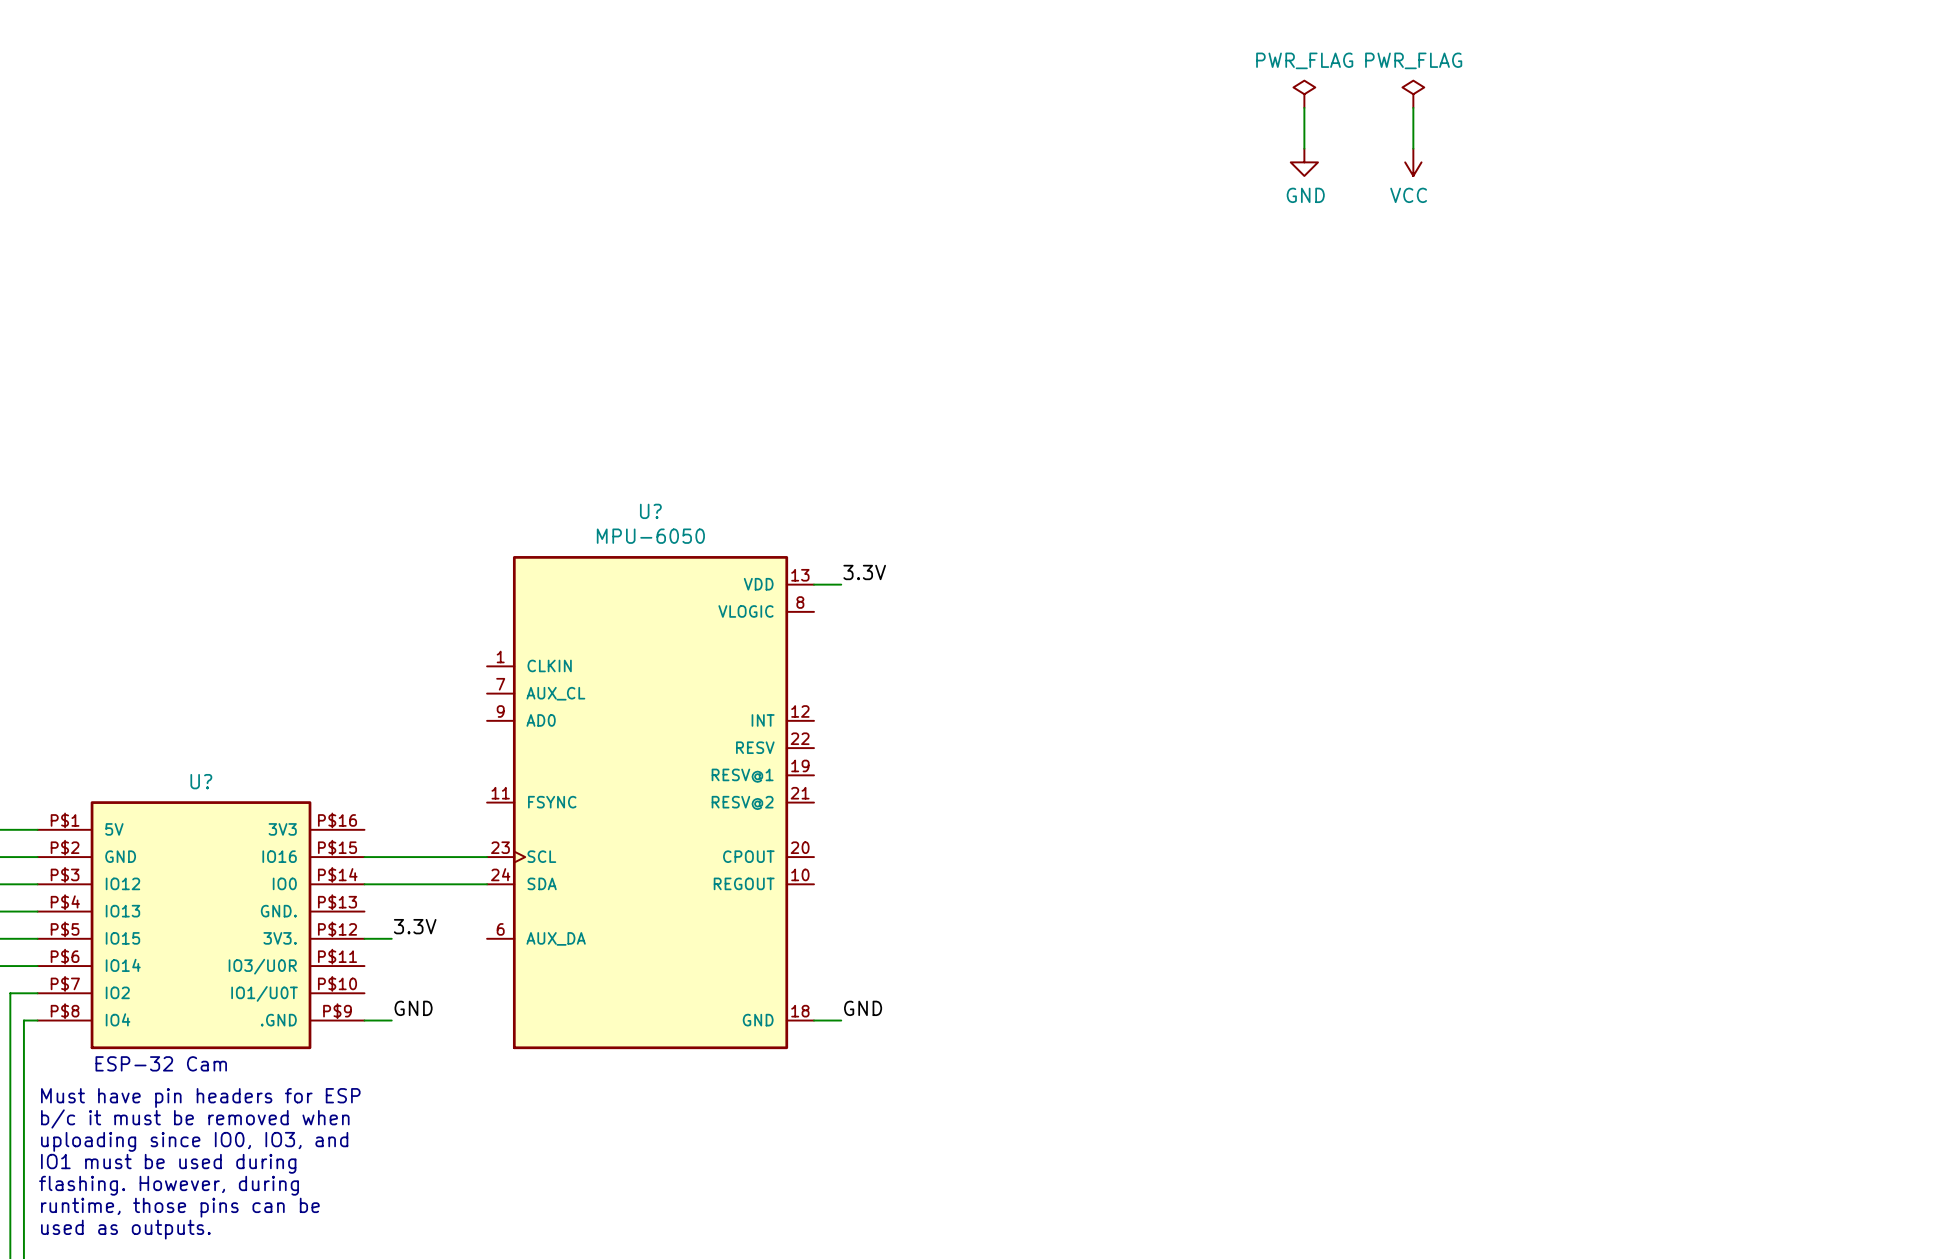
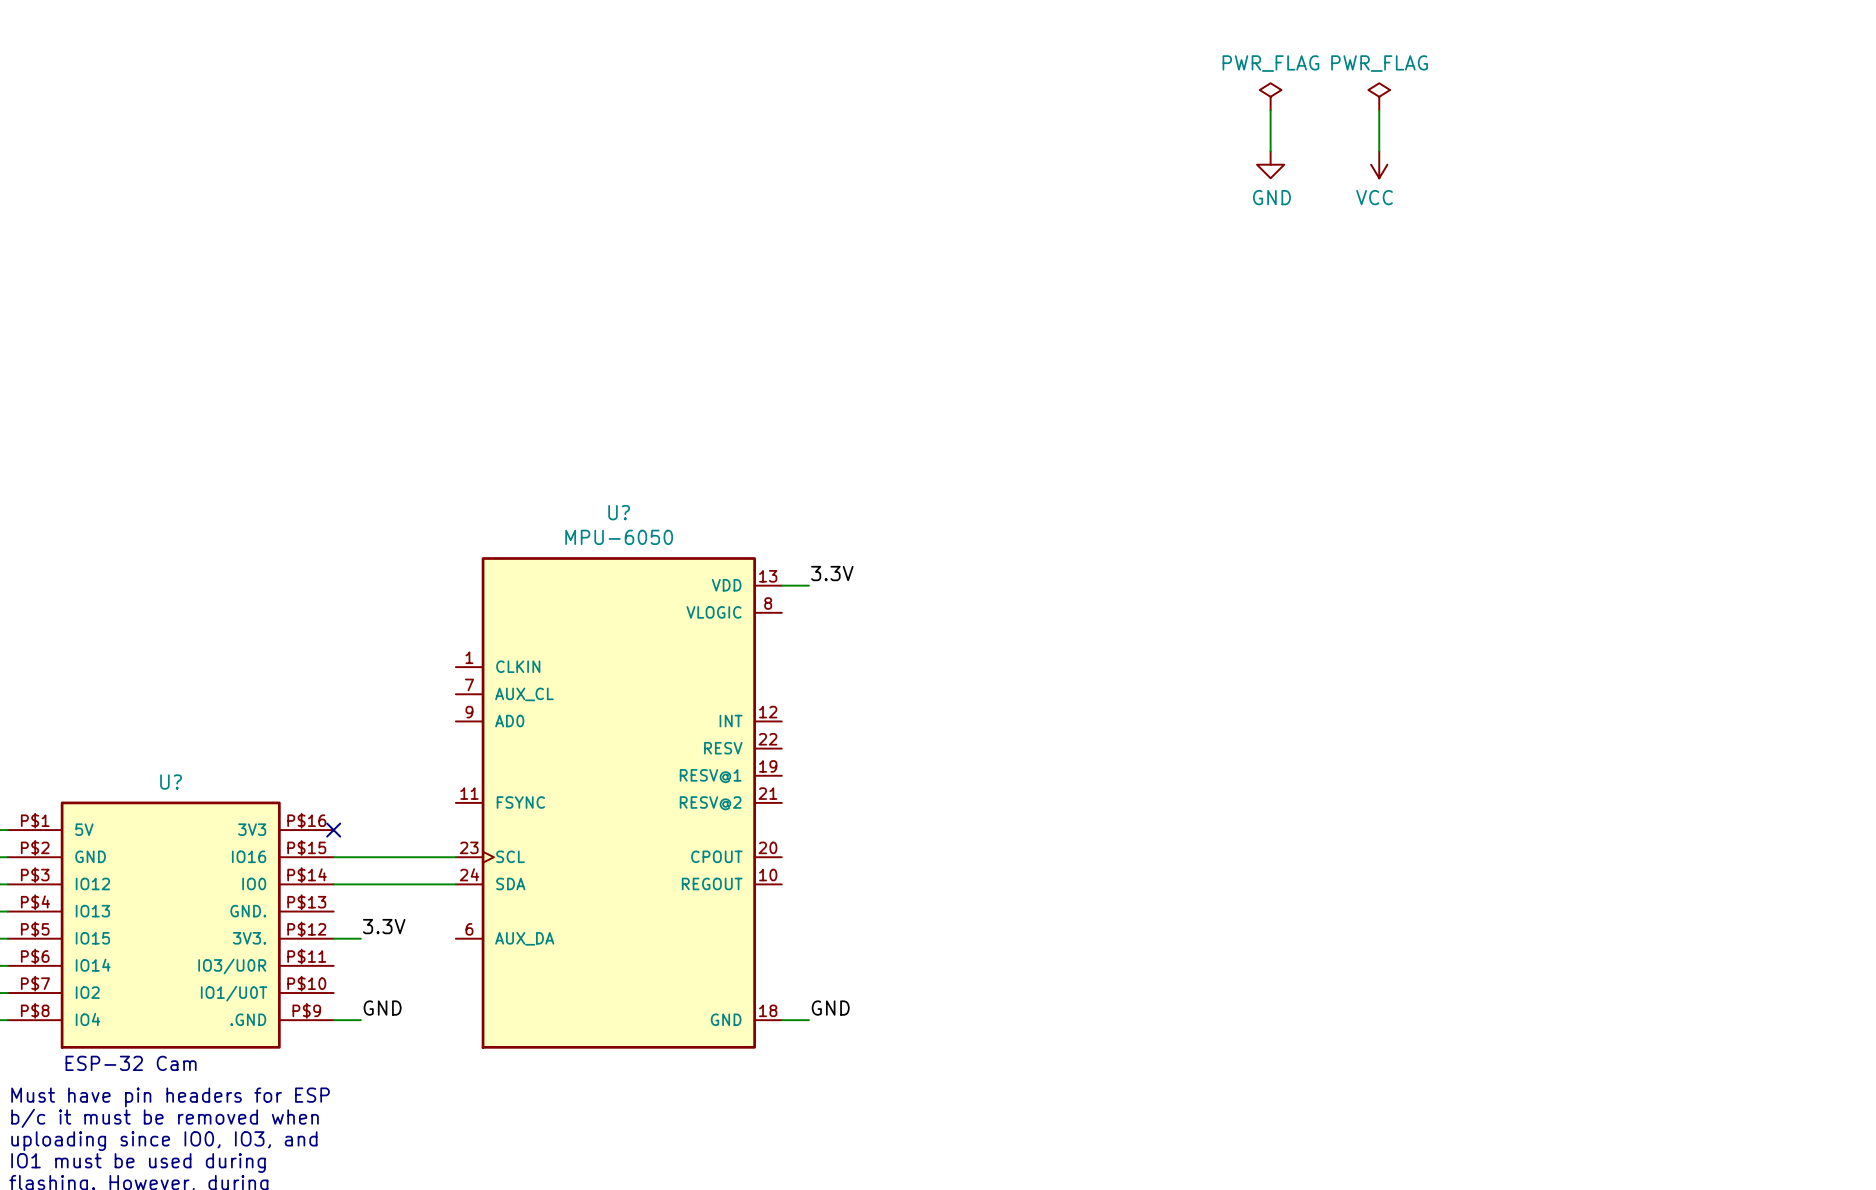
no-connect mark: none -> (333, 830)

